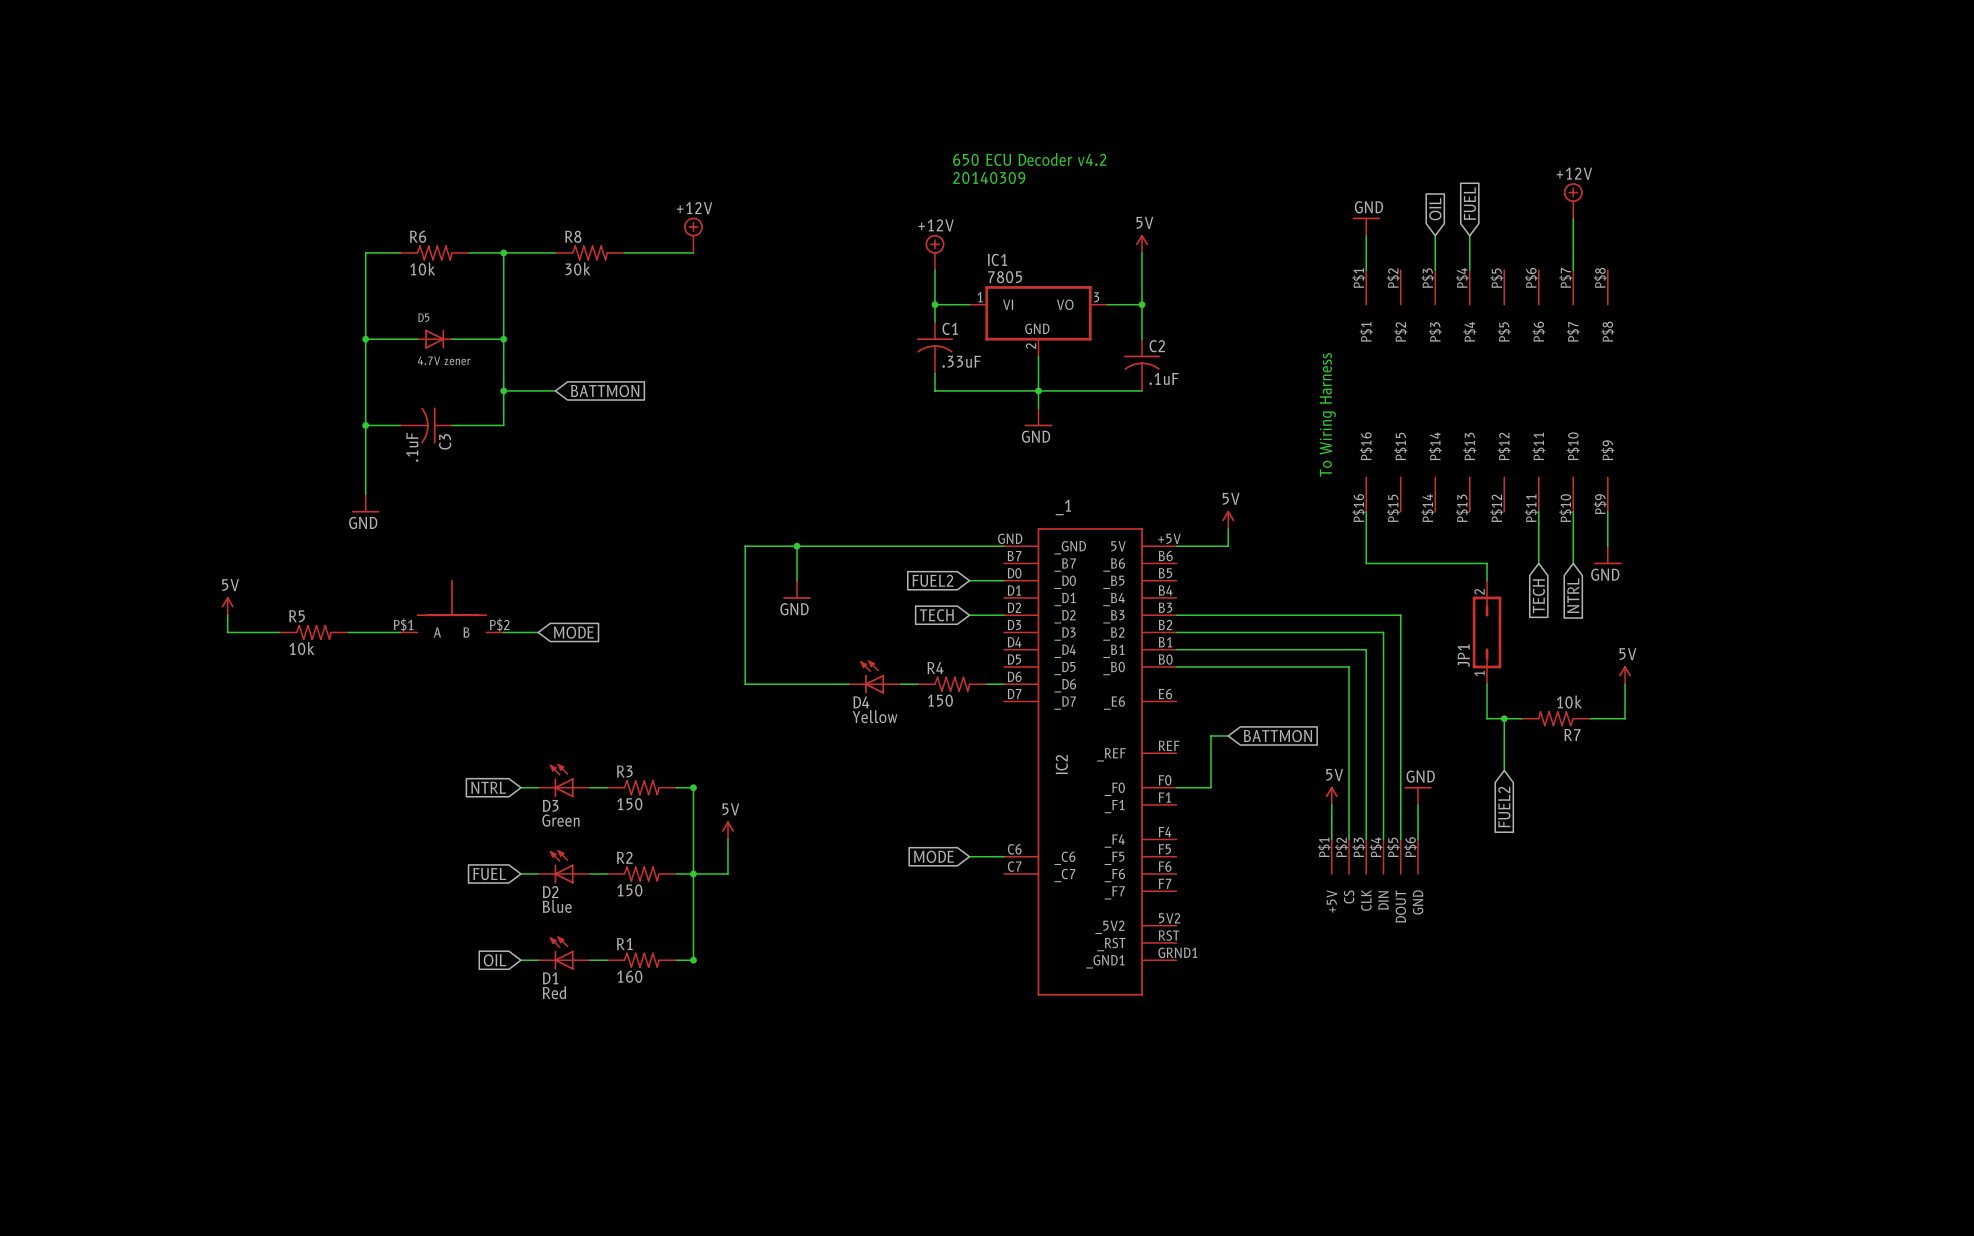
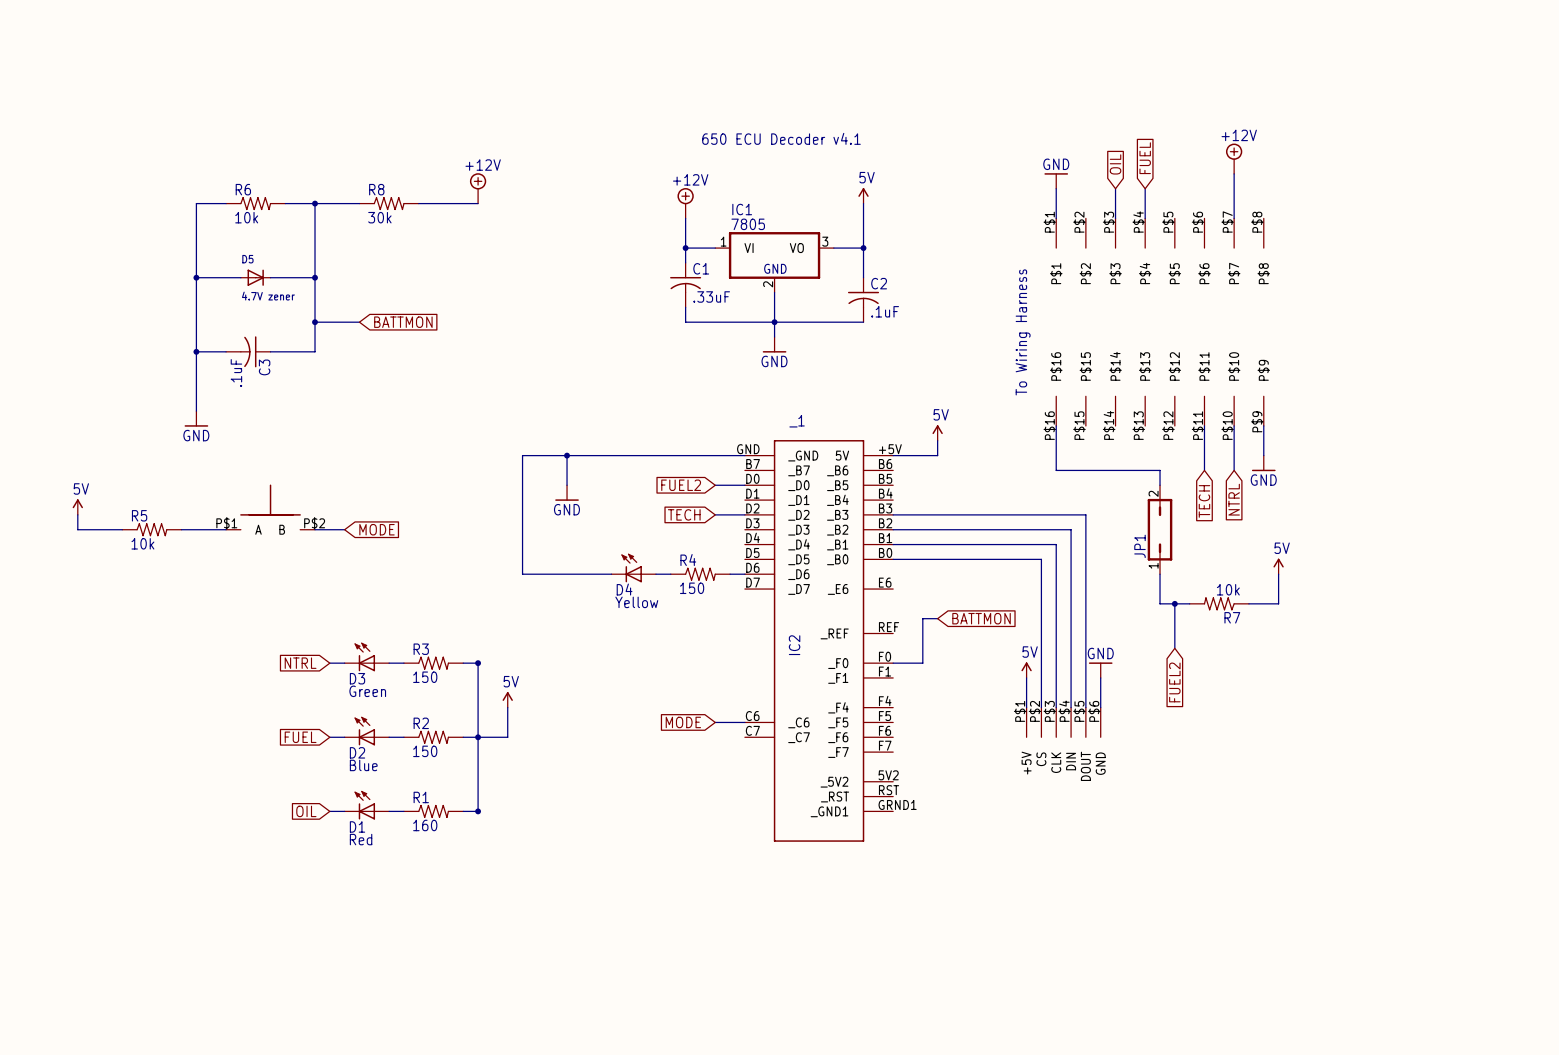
text: 650 ECU Decoder v4.2 (1029, 159) -> none
text: 20140309 (989, 177) -> 650 ECU Decoder v4.1 (781, 138)

